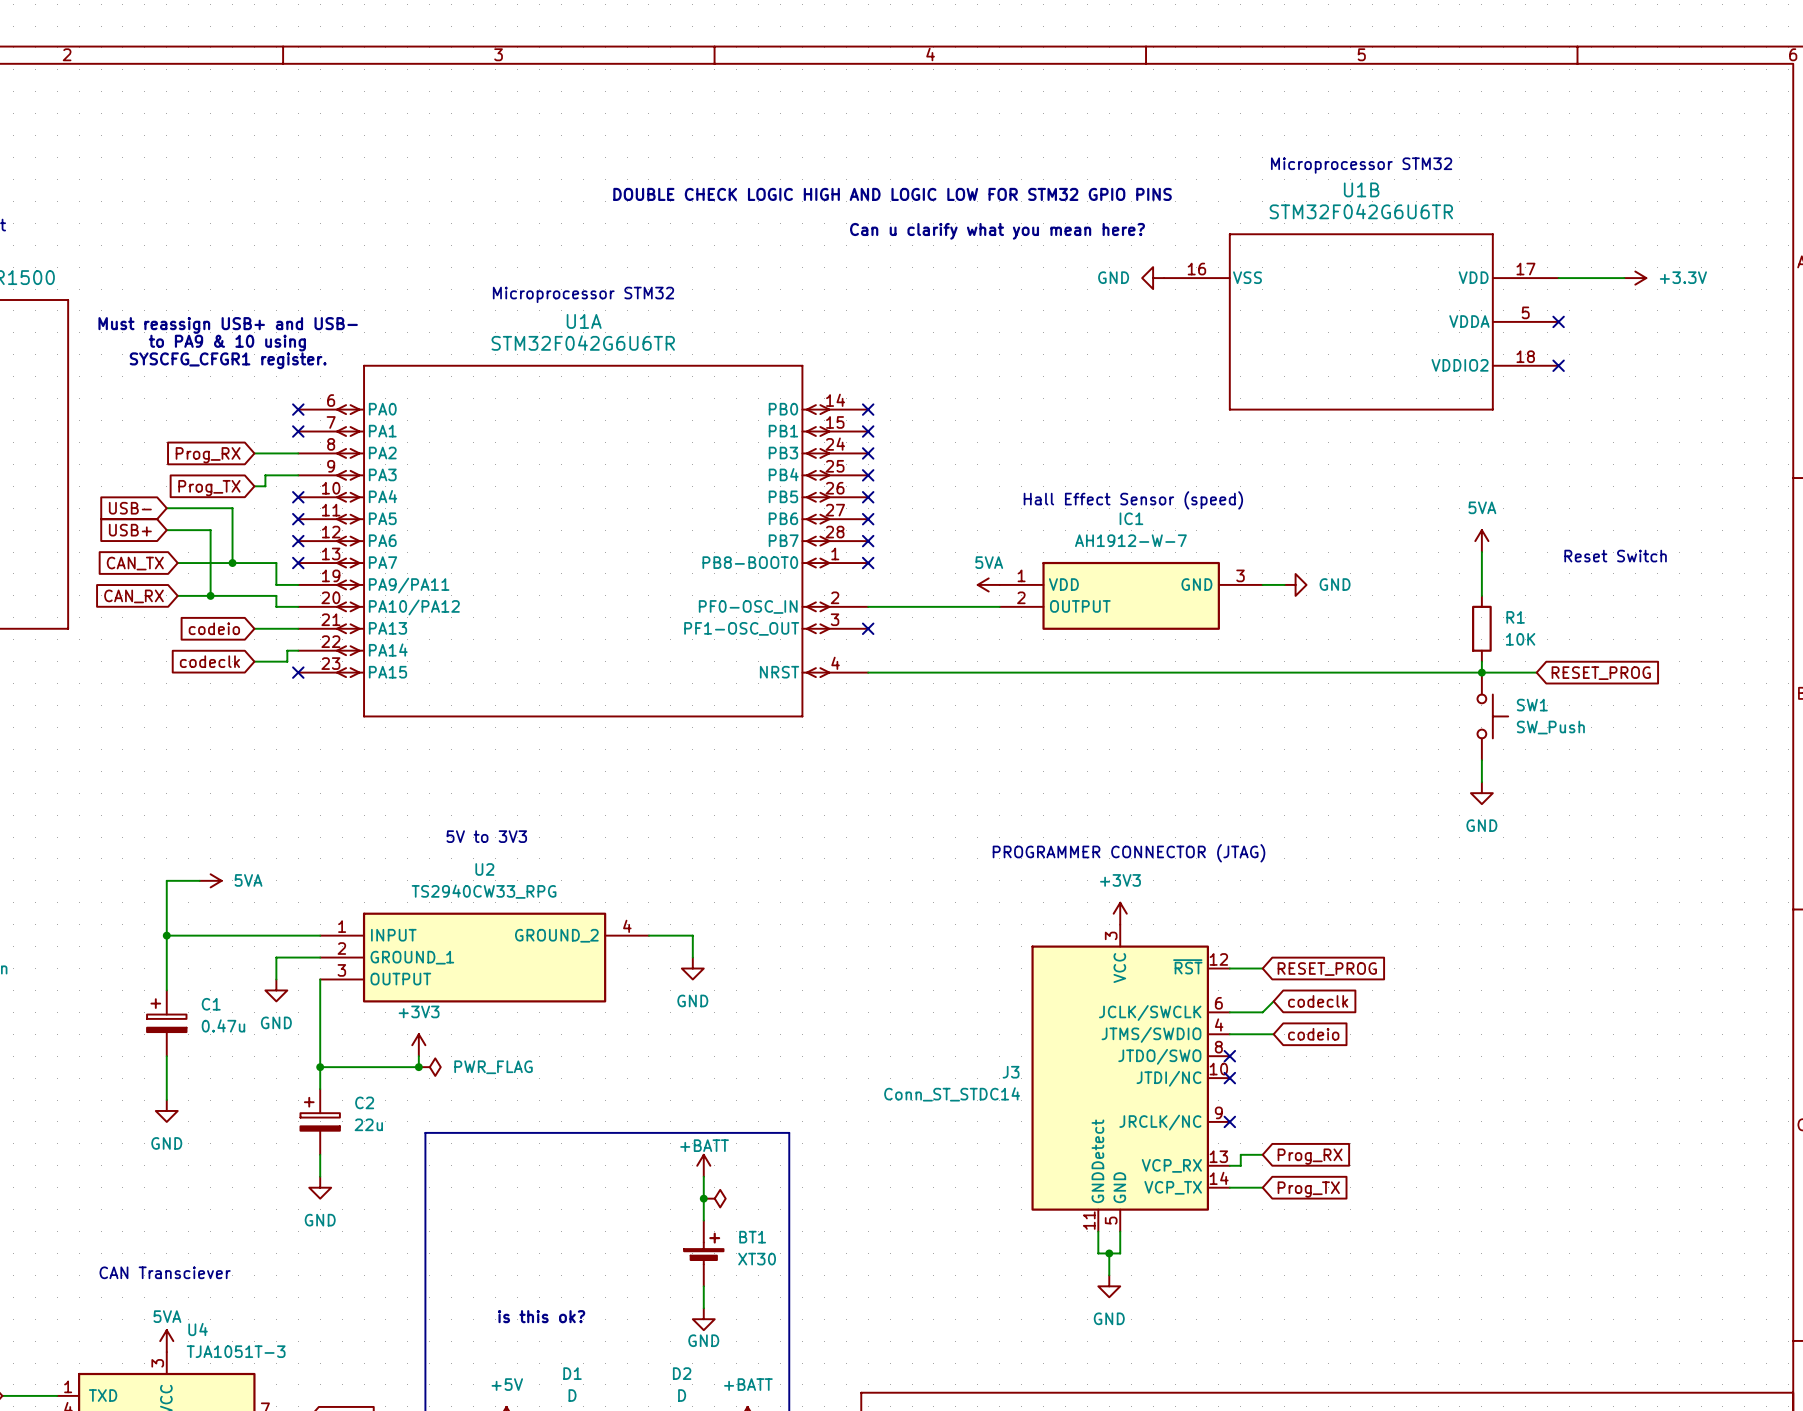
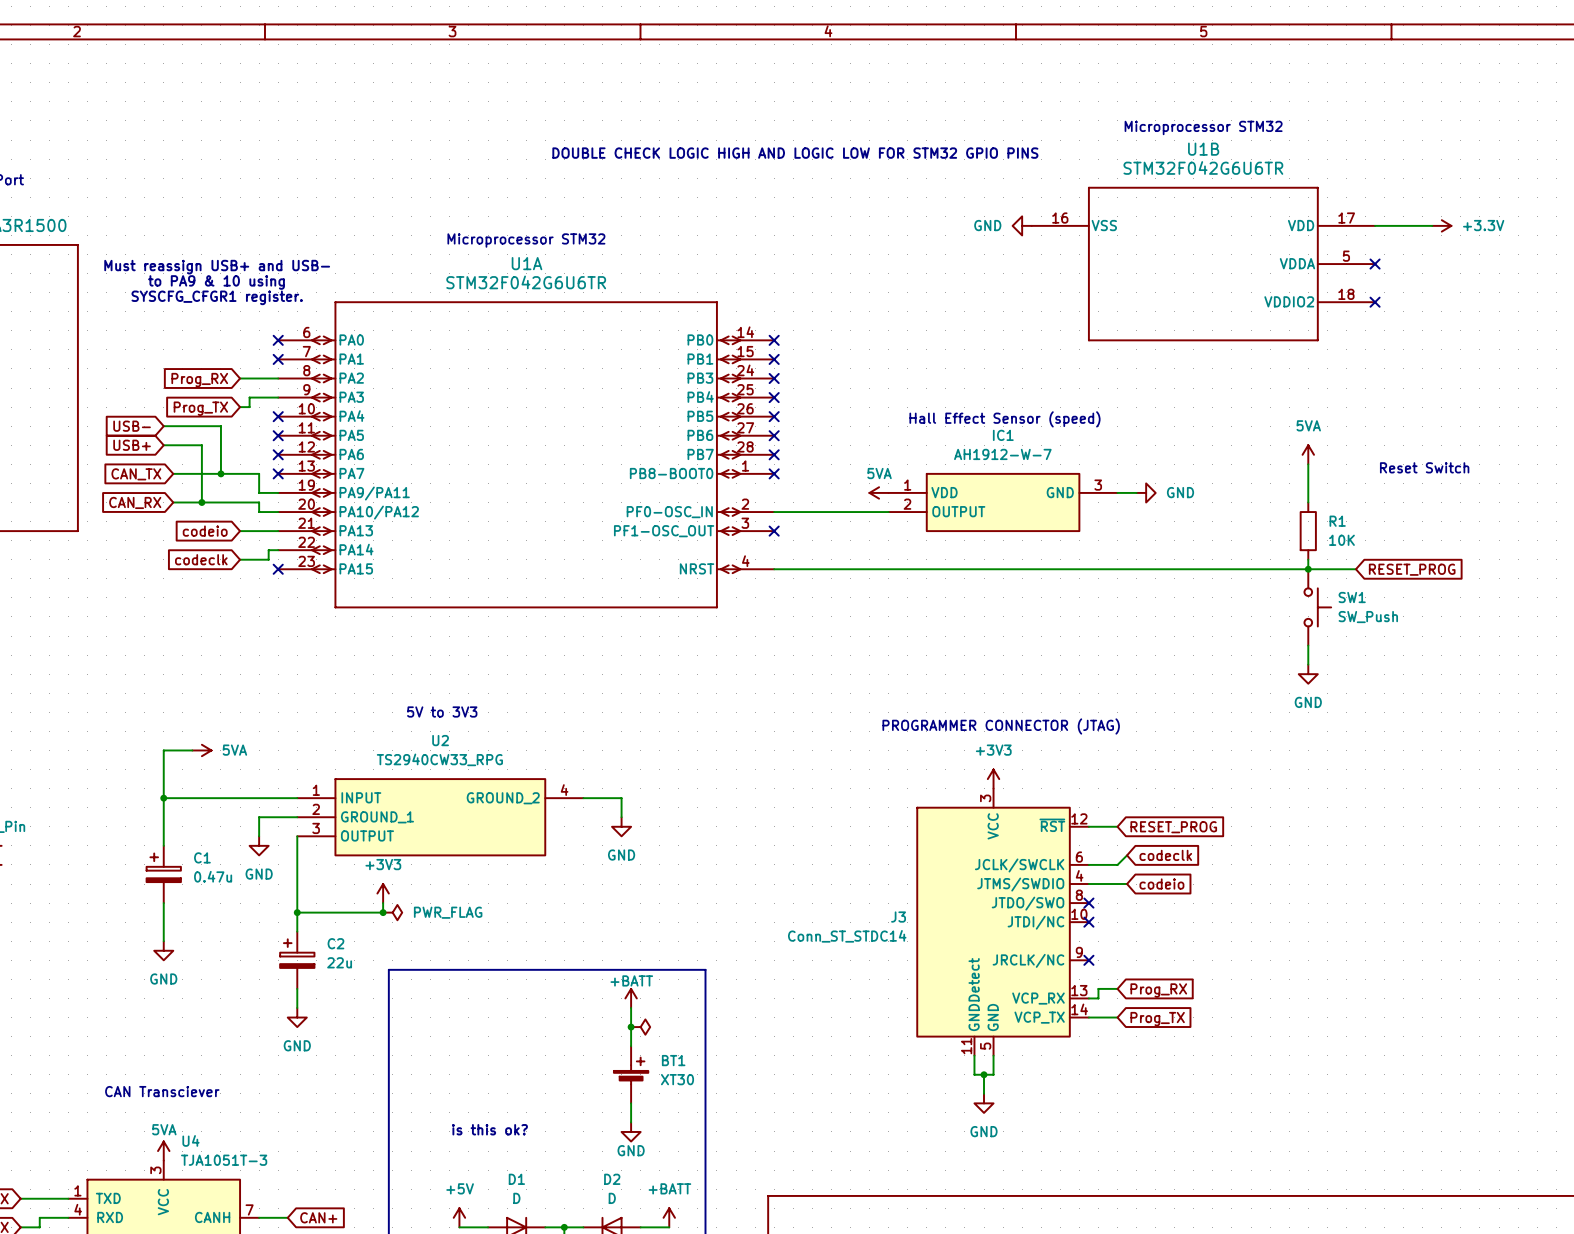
text: Can u clarify what you mean here? (997, 231) -> none

